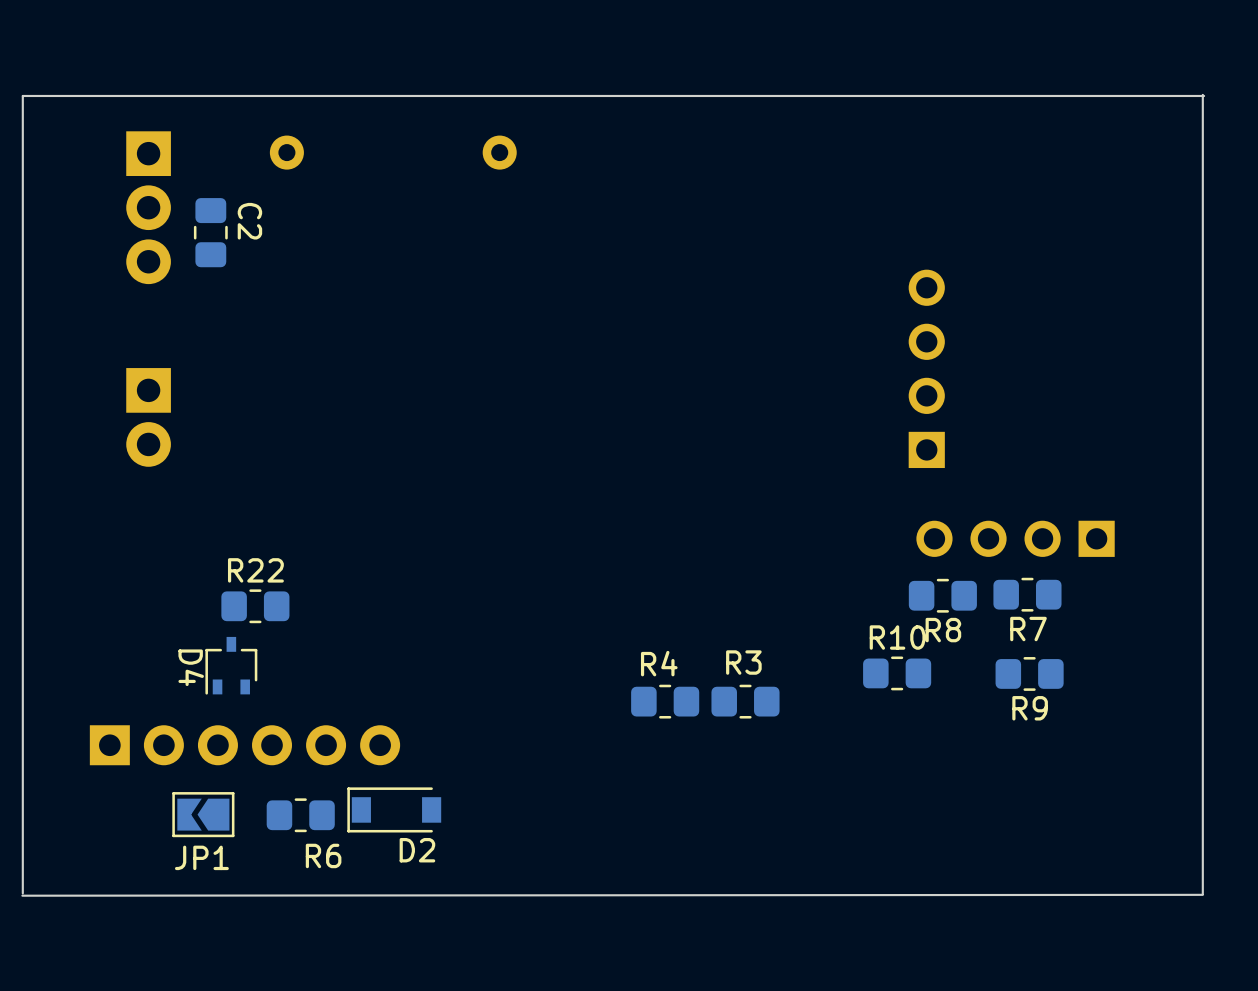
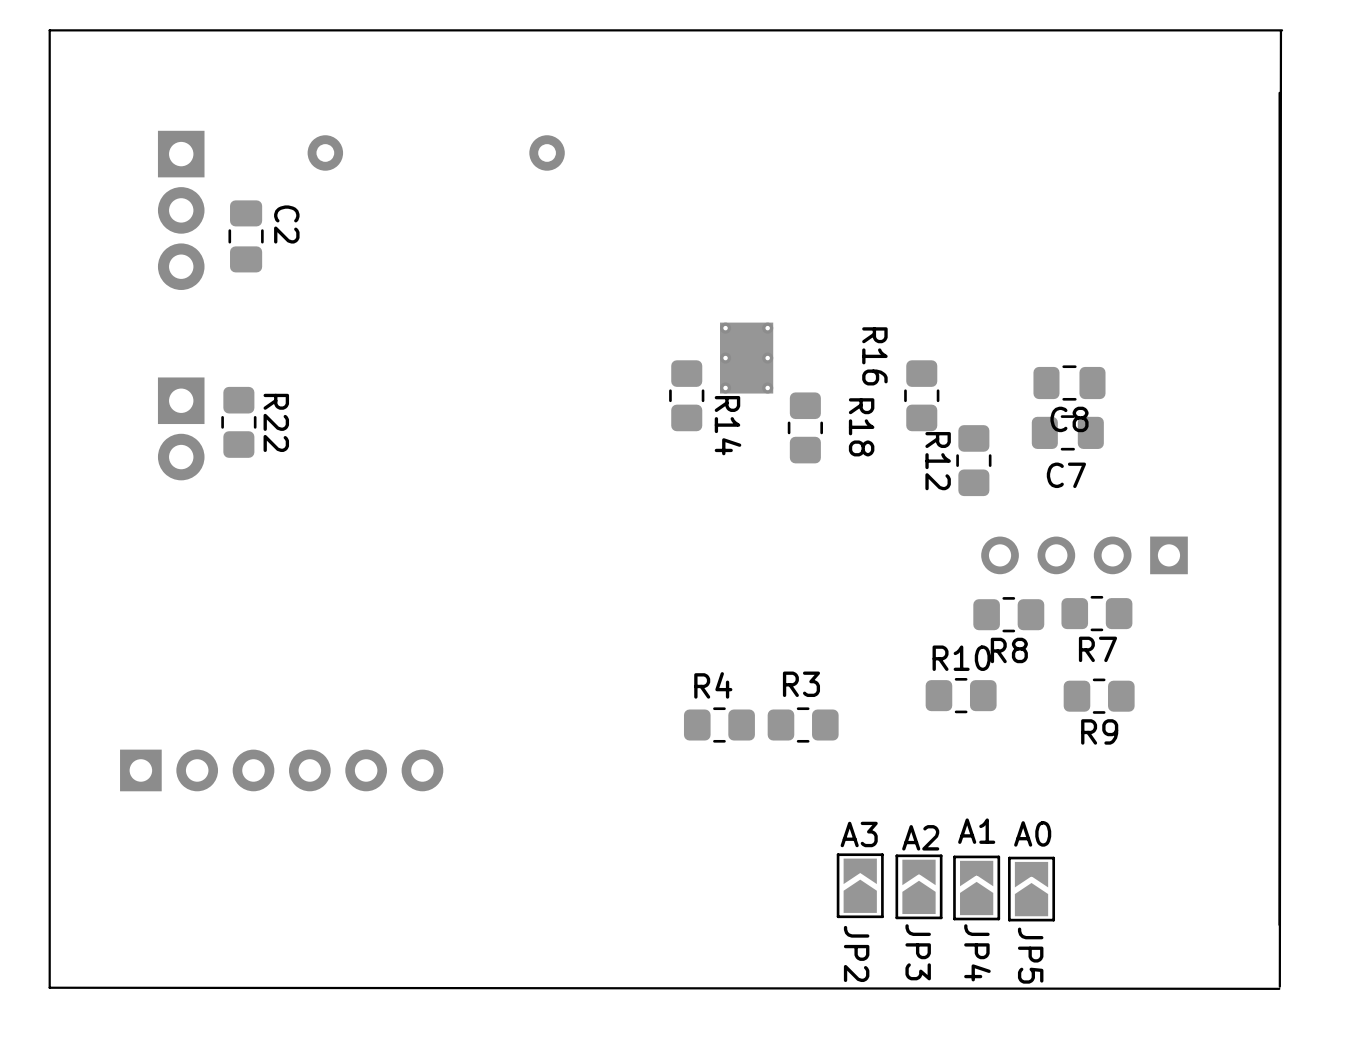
board edge: none -> (1282, 30) (49, 30) (49, 987) (1279, 988)
board edge: none -> (1280, 31) (1279, 986)
board edge: (1204, 95) (22, 95) (22, 893) -> none
part: none -> (746, 358)
part: (926, 368) -> none
C8: none -> (1069, 383)
R14: none -> (686, 395)
R16: none -> (921, 395)
R18: none -> (805, 427)
C7: none -> (1067, 432)
R12: none -> (973, 460)
R22 rotation: 0° (255, 606) -> 90° clockwise (238, 422)
R22 position: (255, 606) -> (238, 422)
D4: (231, 665) -> none
D2: (394, 809) -> none
JP1: (203, 814) -> none
R6: (300, 815) -> none
JP2: none -> A3 (860, 885)
JP3: none -> A2 (918, 886)
JP4: none -> A1 (976, 887)
JP5: none -> A0 (1031, 889)
board edge: (1202, 894) (22, 895) -> none

